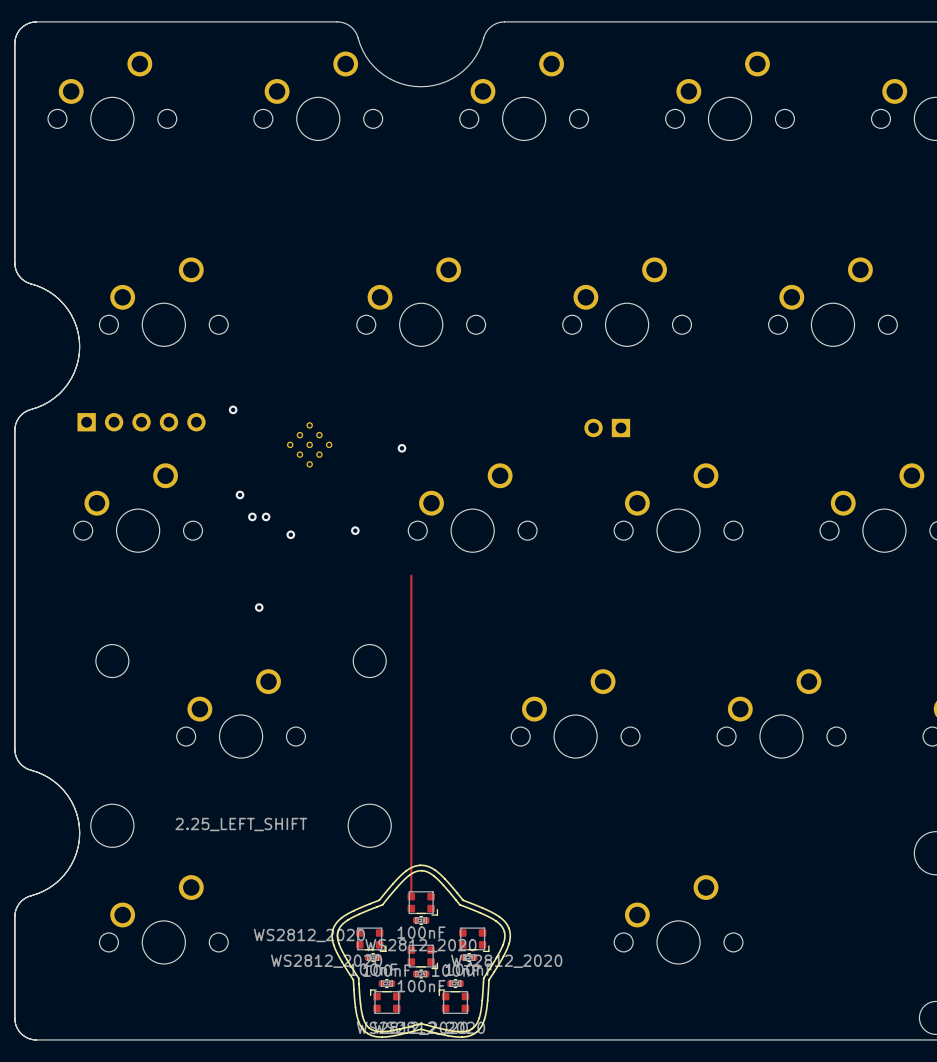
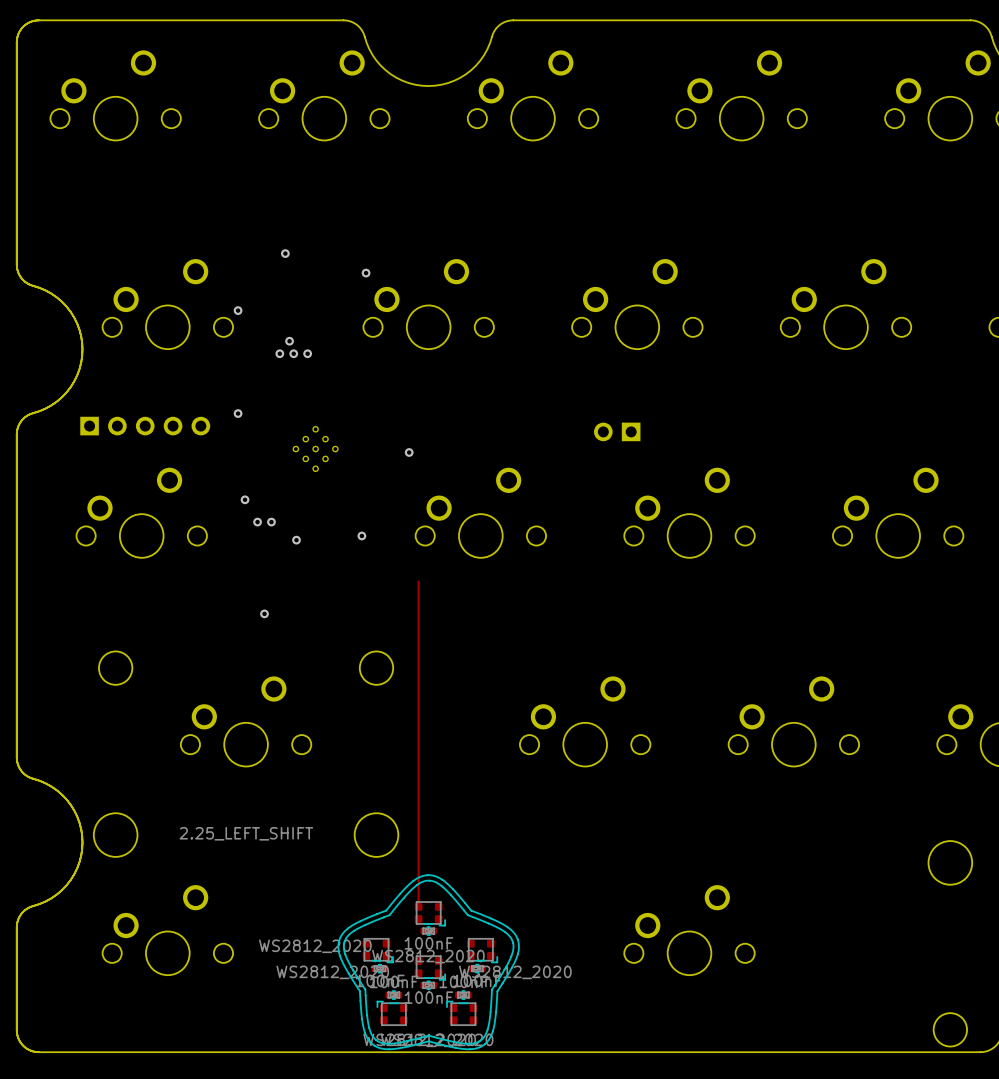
via: none -> (285, 253)
via: none -> (366, 273)
via: none -> (238, 310)
via: none -> (289, 341)
via: none -> (279, 353)
via: none -> (293, 353)
via: none -> (307, 353)

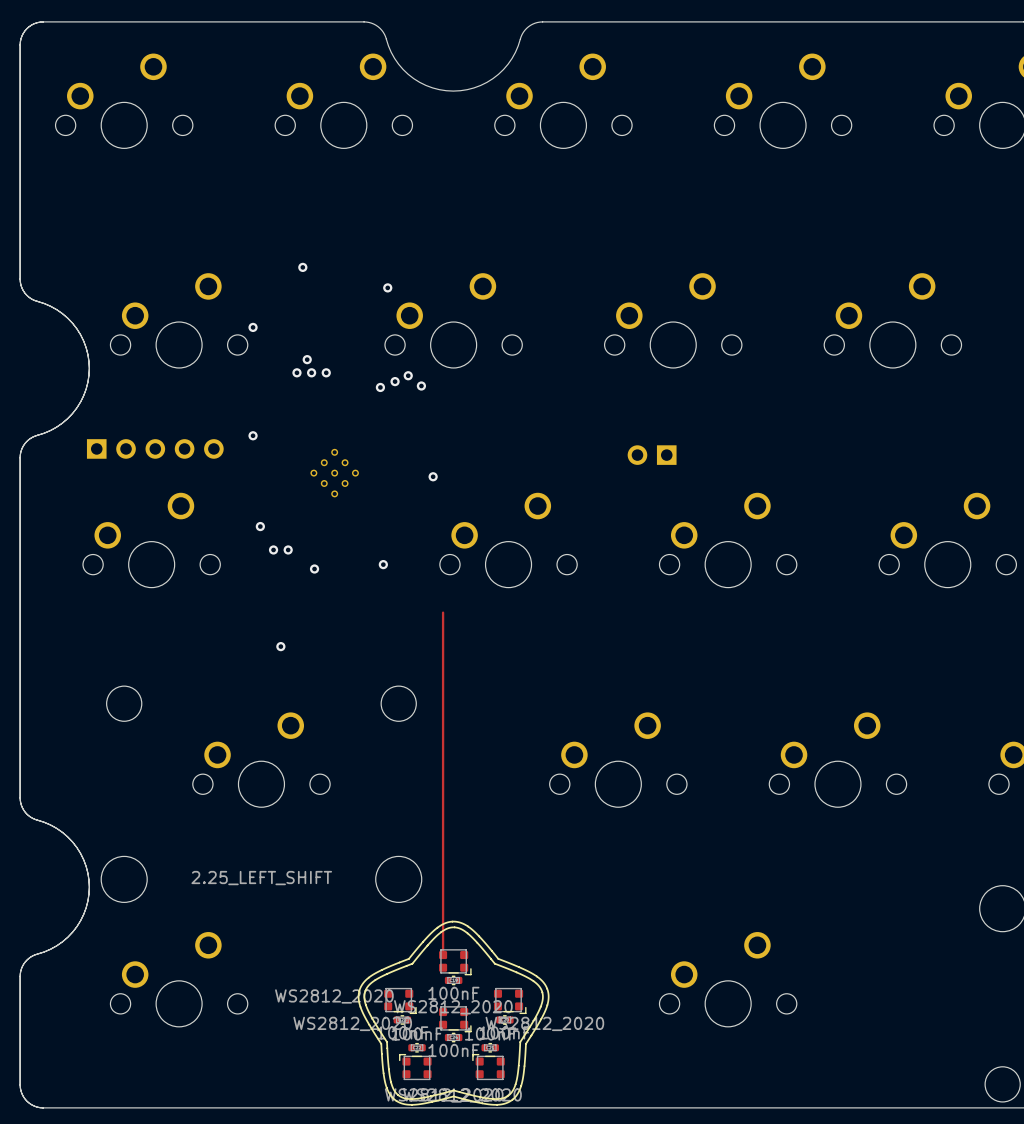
via: none -> (408, 375)
via: none -> (395, 381)
via: none -> (421, 385)
via: none -> (380, 387)

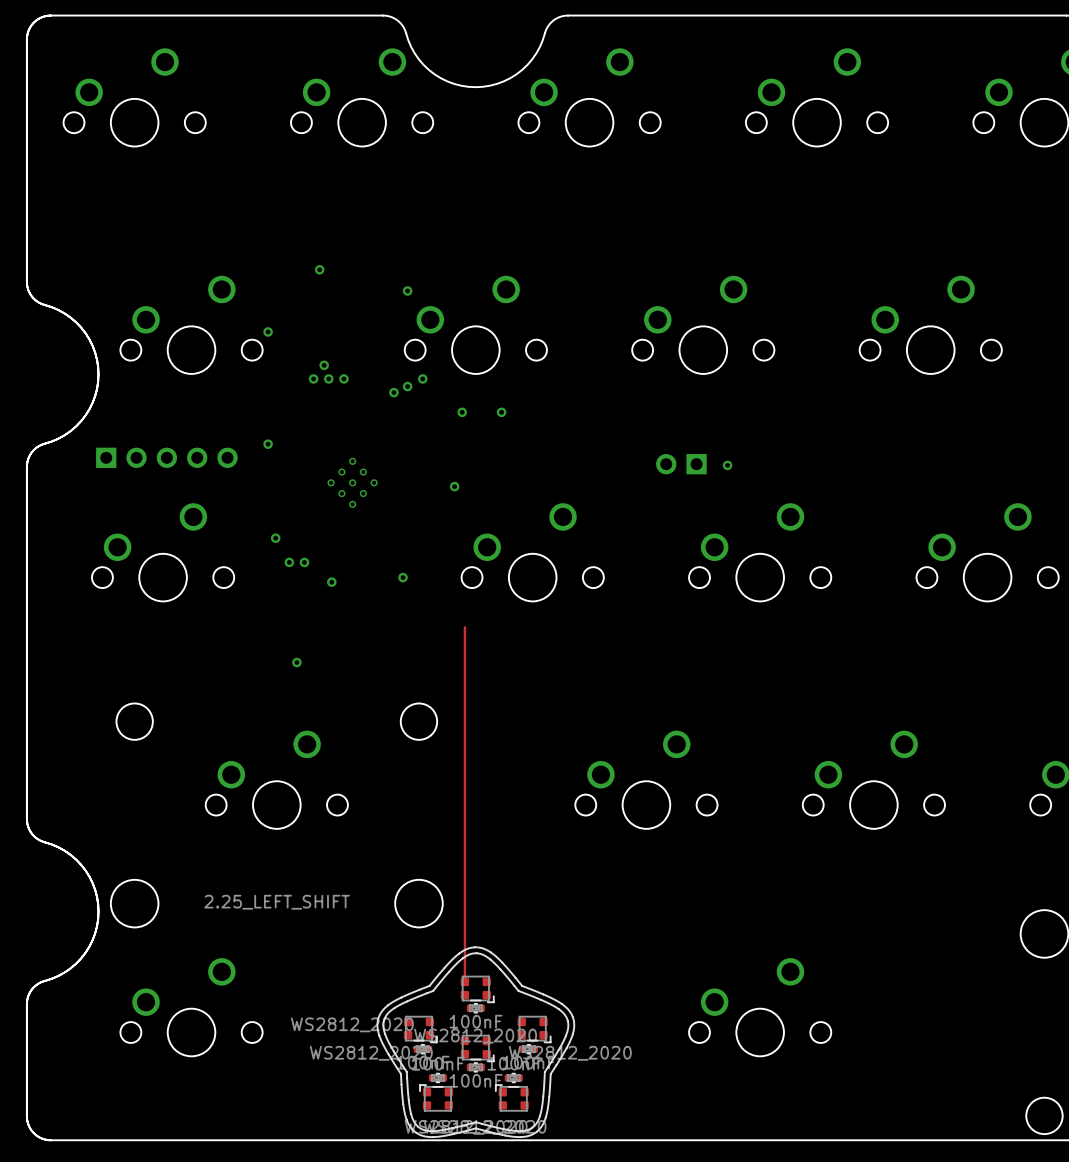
via: none -> (422, 378)
via: (408, 375) -> none
via: none -> (407, 386)
via: (395, 381) -> none
via: none -> (393, 392)
via: (421, 385) -> none
via: (380, 387) -> none
via: none -> (462, 412)
via: none -> (501, 412)
via: none -> (727, 465)

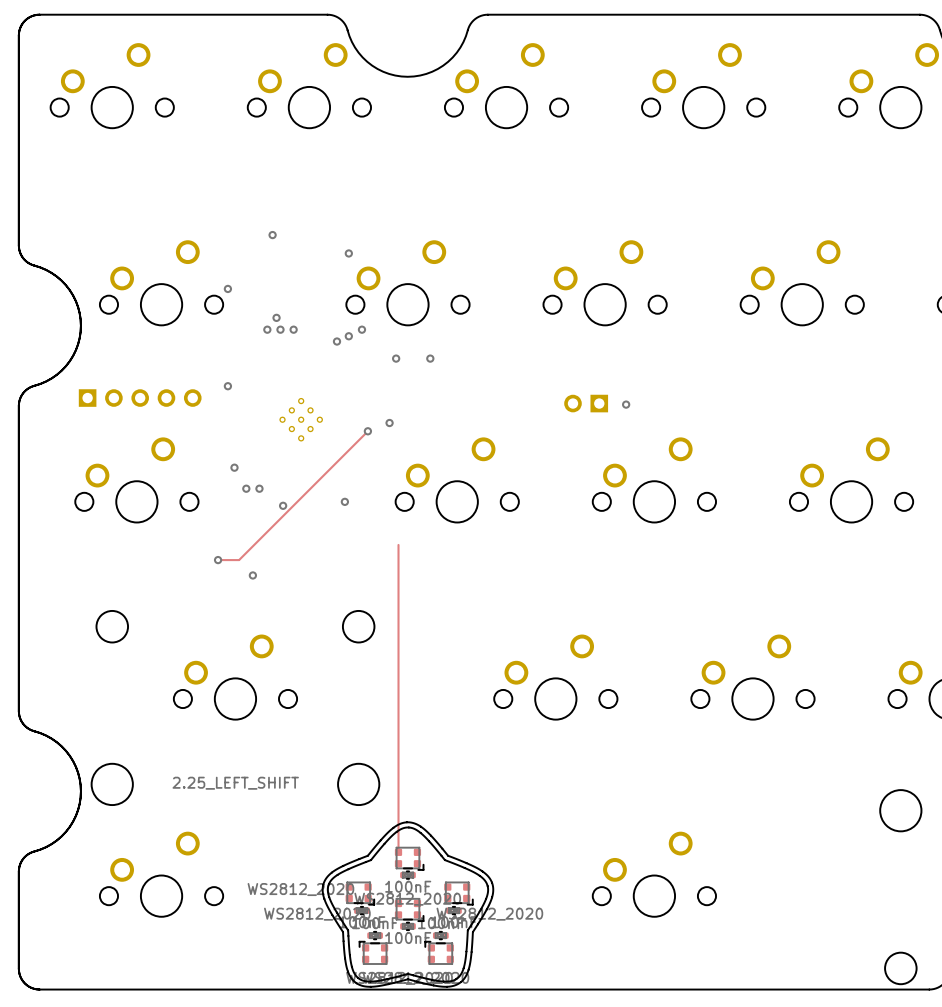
track: none -> (367, 431) (239, 560) (218, 560)
via: none -> (367, 431)
via: none -> (218, 560)

